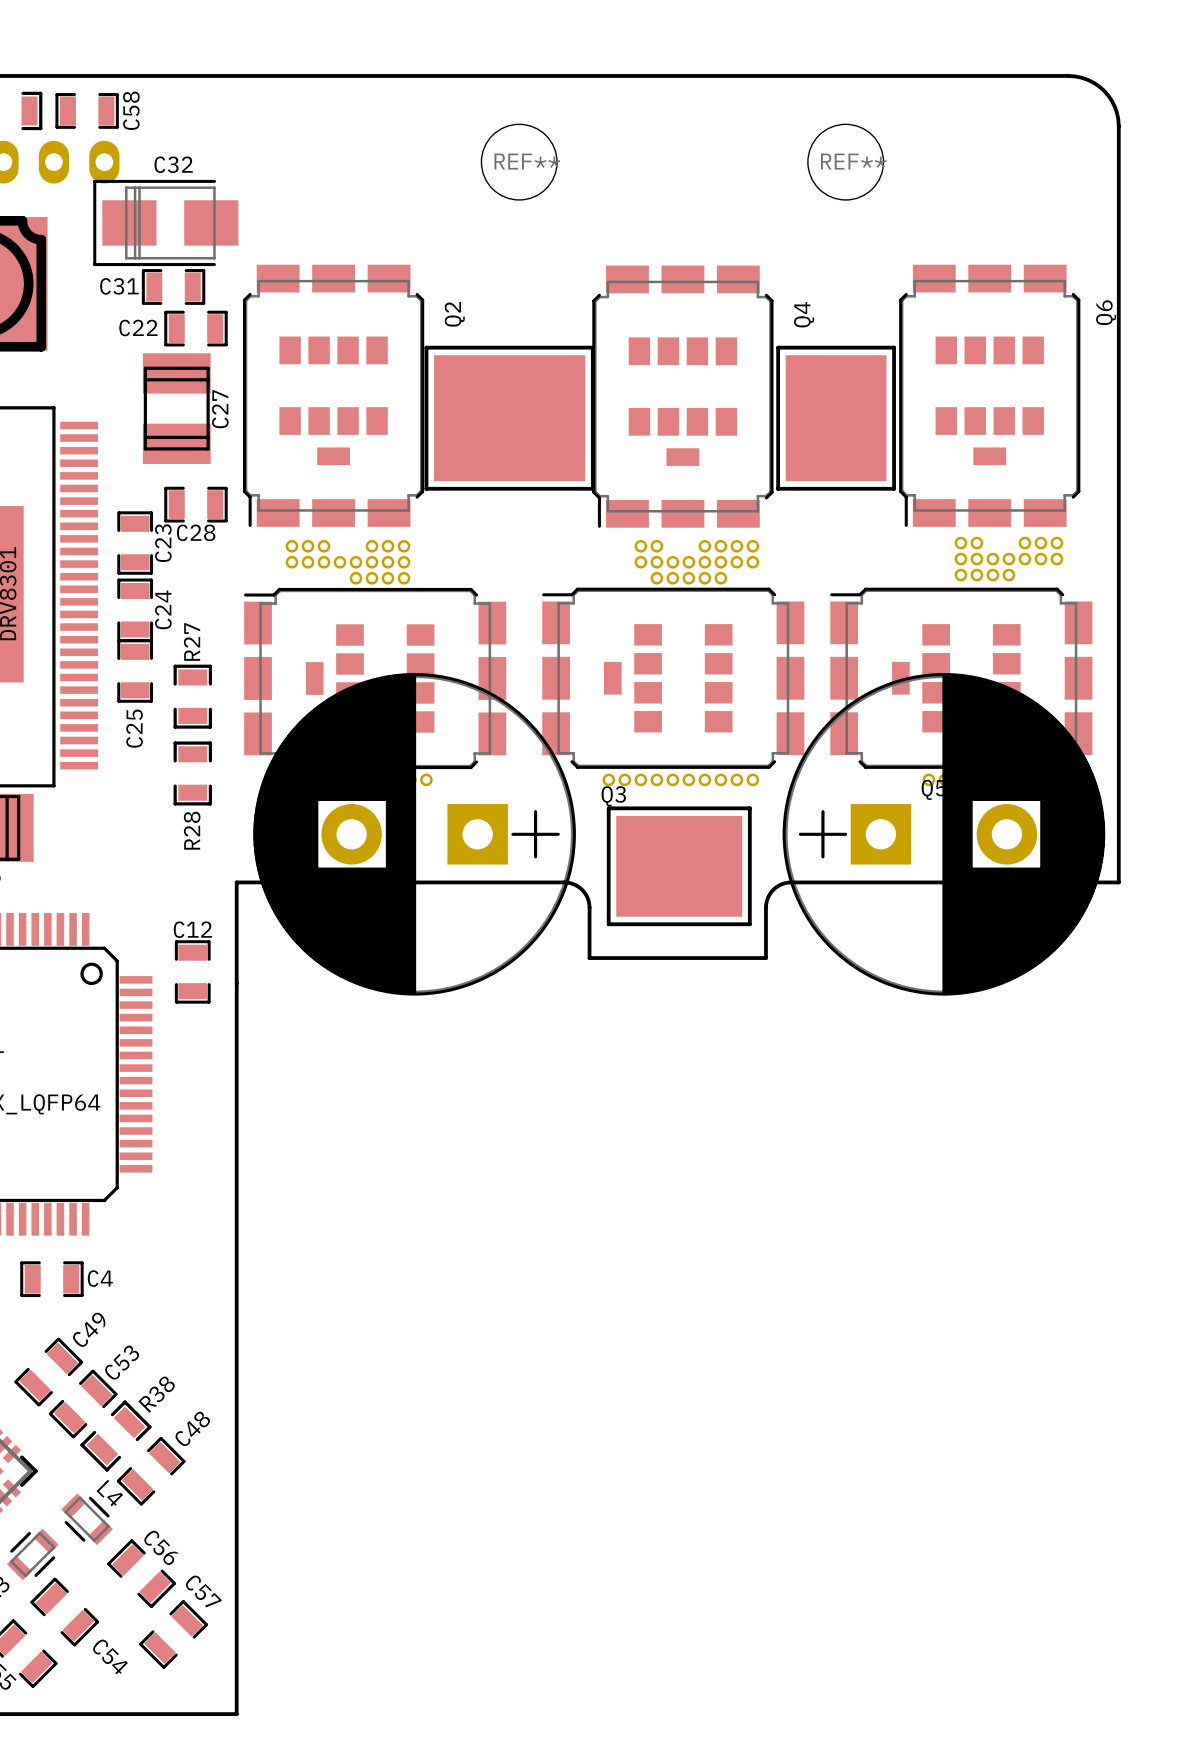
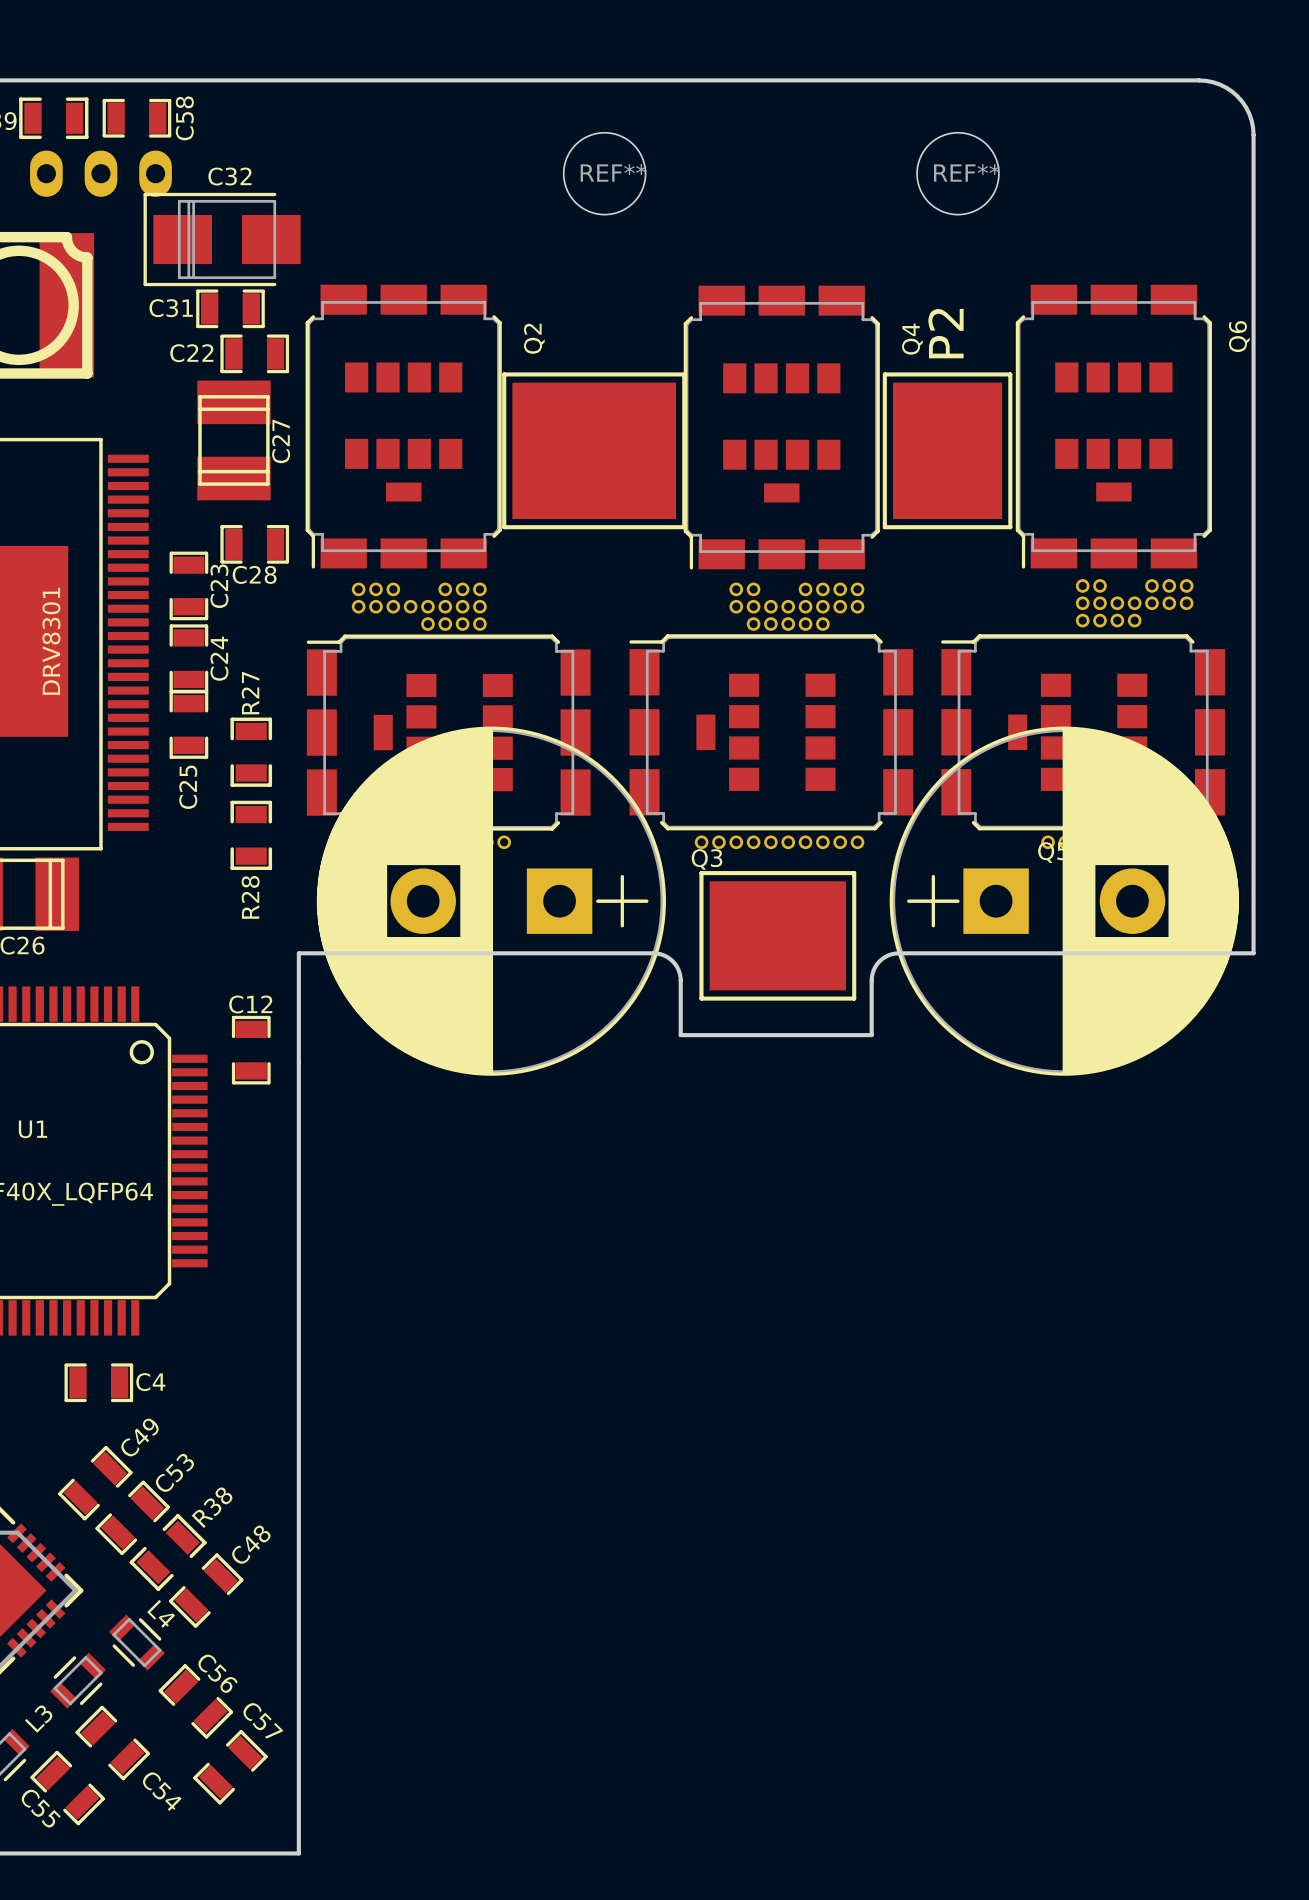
P2 name: none -> P2 (945, 333)

